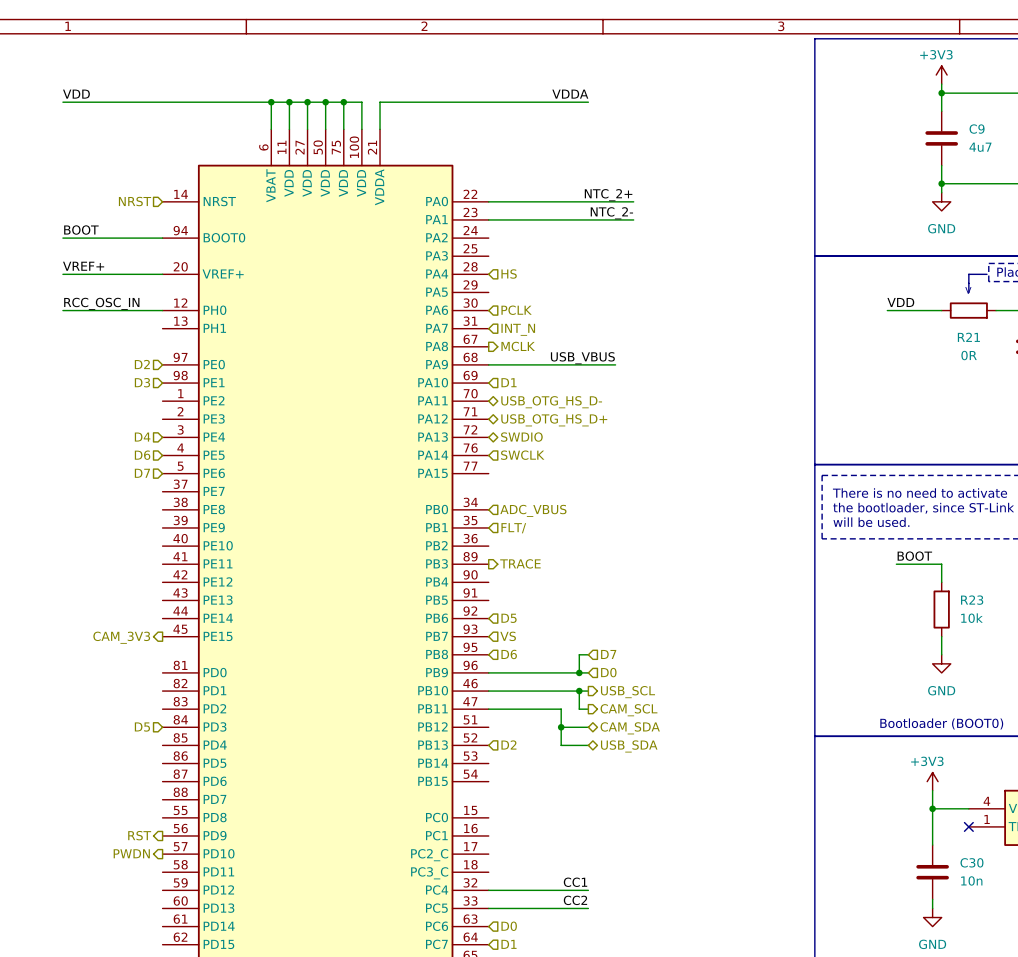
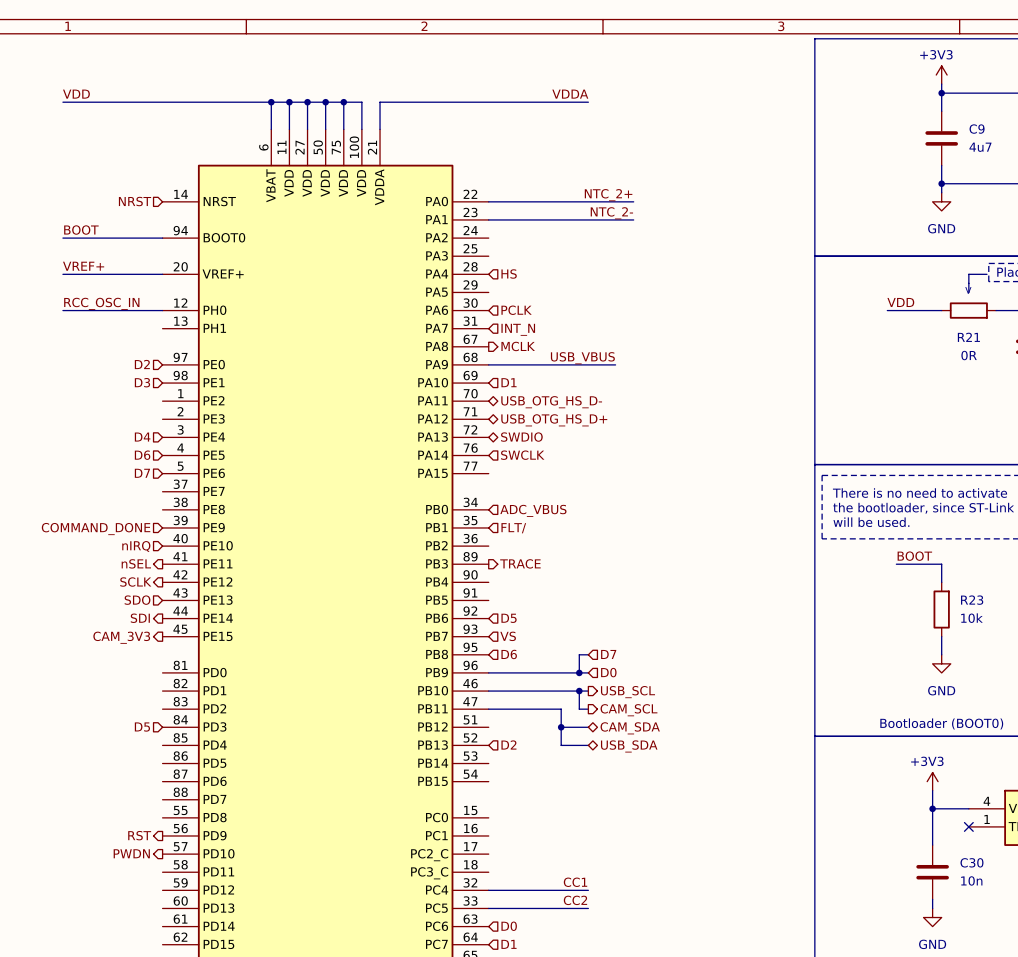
hierarchical label: none -> COMMAND_DONE (96, 529)
hierarchical label: none -> nIRQ (136, 546)
hierarchical label: none -> nSEL (136, 563)
hierarchical label: none -> SCLK (135, 582)
hierarchical label: none -> SDO (137, 600)
hierarchical label: none -> SDI (140, 618)

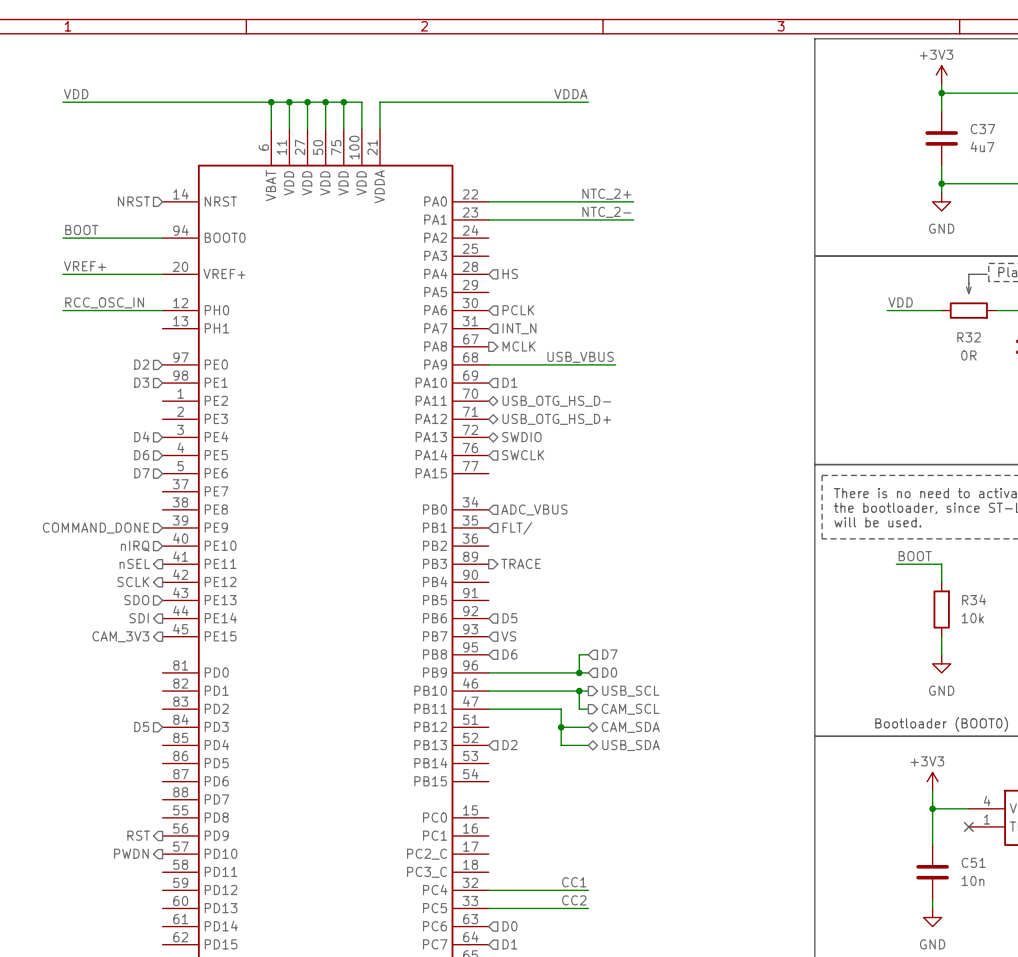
C9 name: C9 (977, 129) -> C37 (982, 129)
R21 name: R21 (968, 337) -> R32 (969, 337)
R23 name: R23 (972, 600) -> R34 (974, 599)
C30 name: C30 (971, 862) -> C51 (973, 862)

